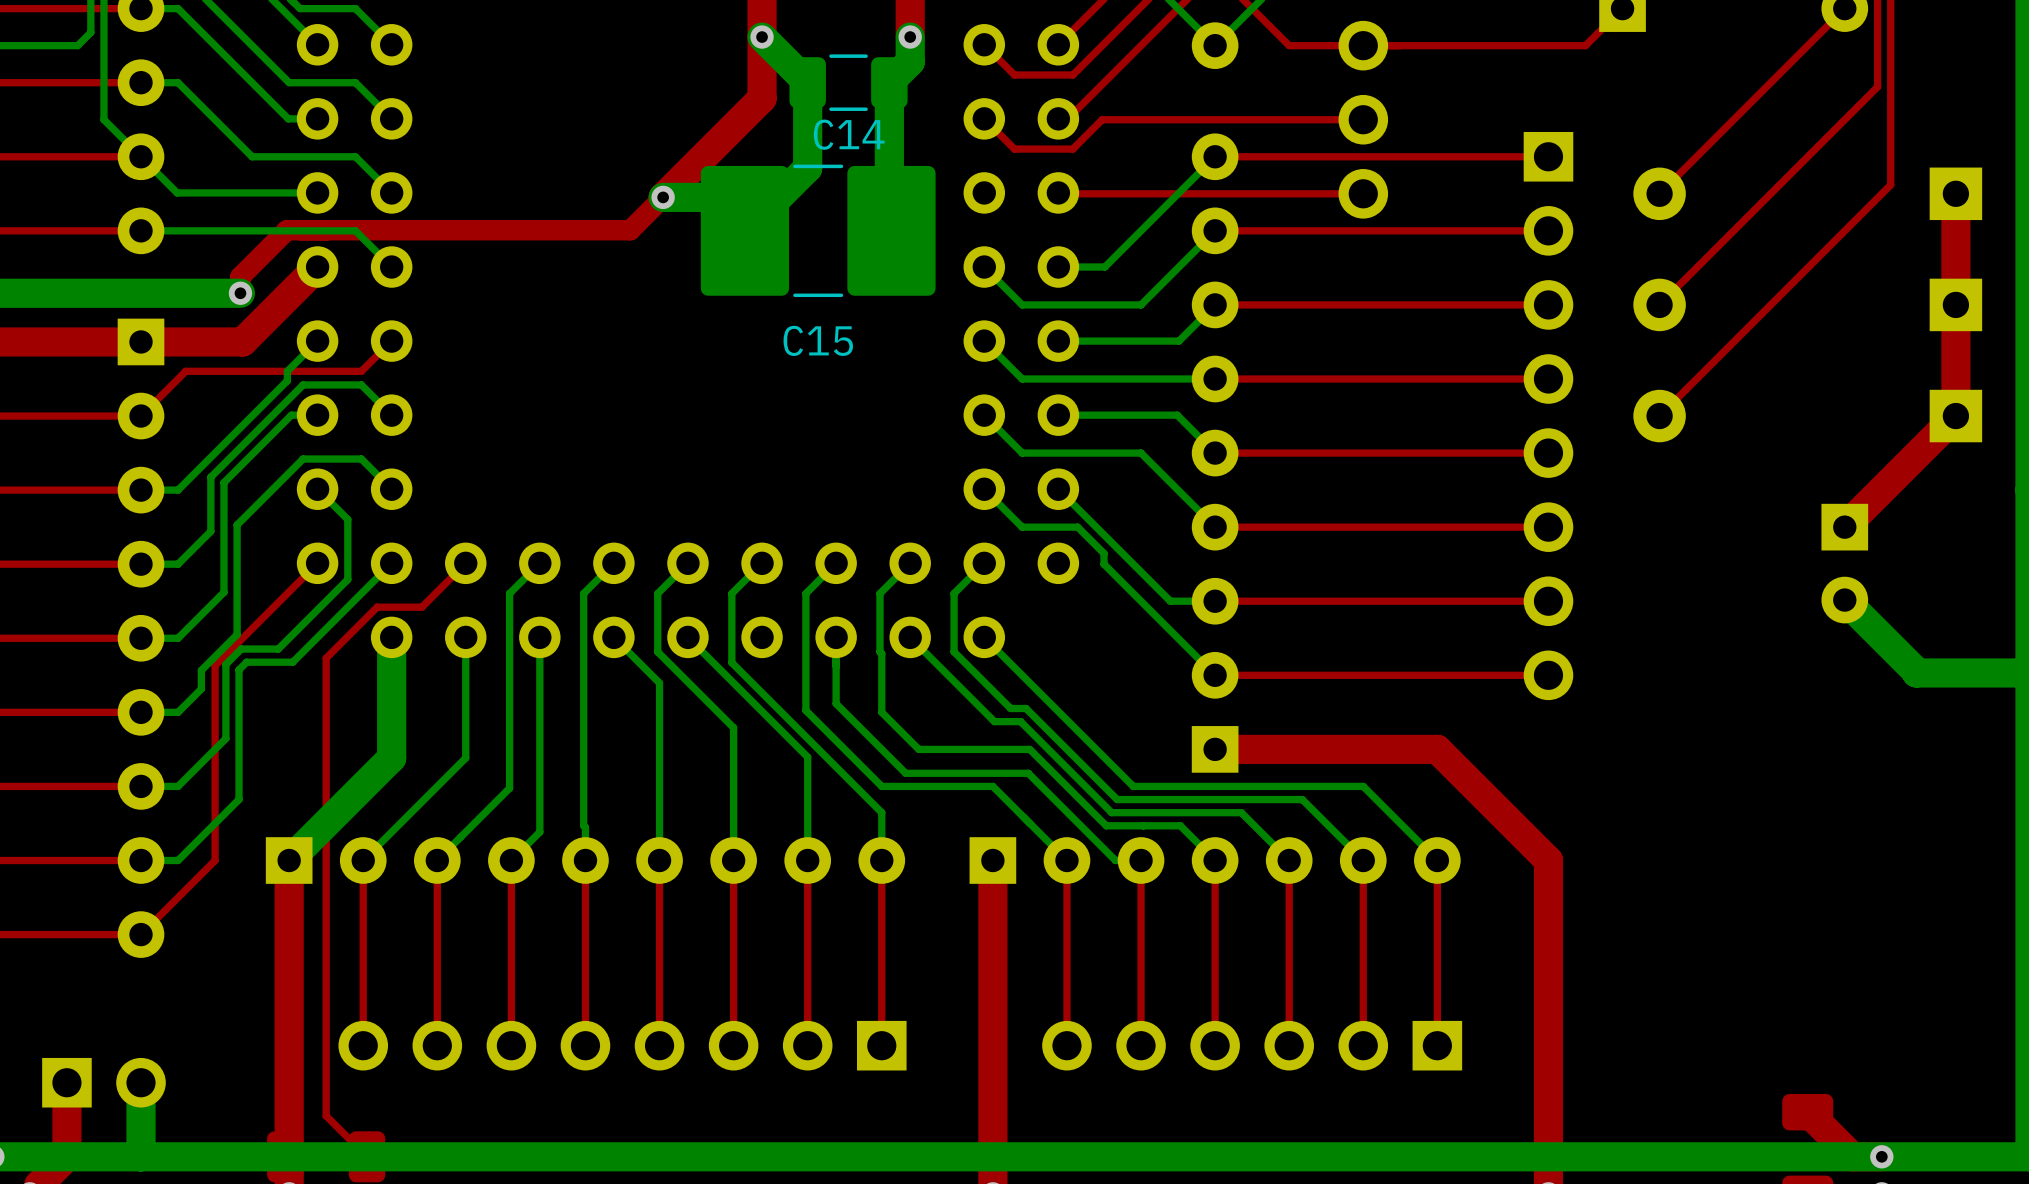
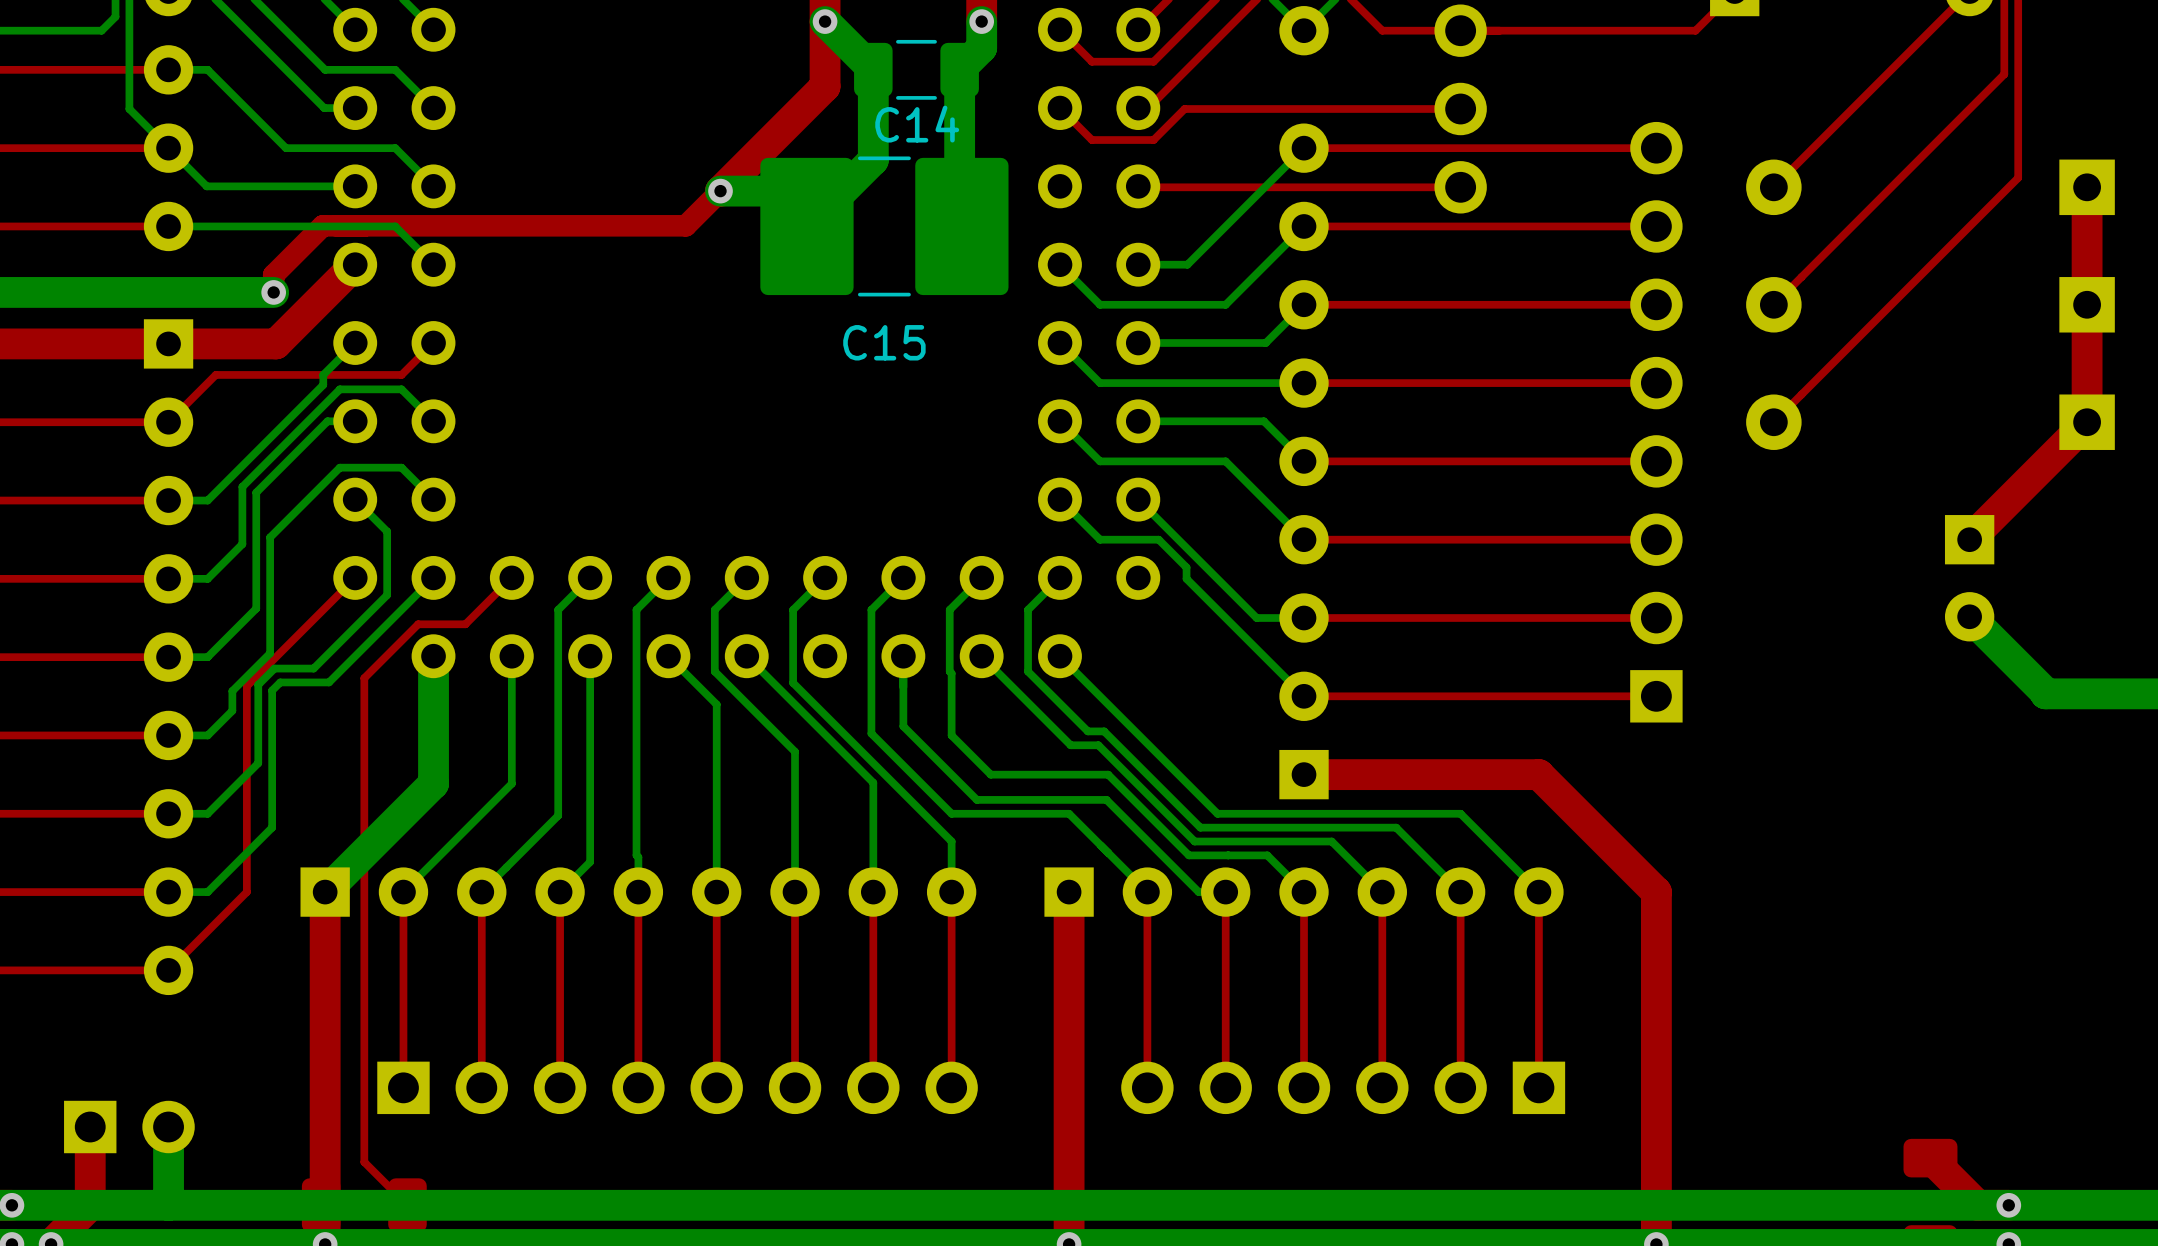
part rotation: 0° (1548, 416) -> 180° (1656, 422)
part rotation: 0° (622, 1045) -> 180° (677, 1087)

